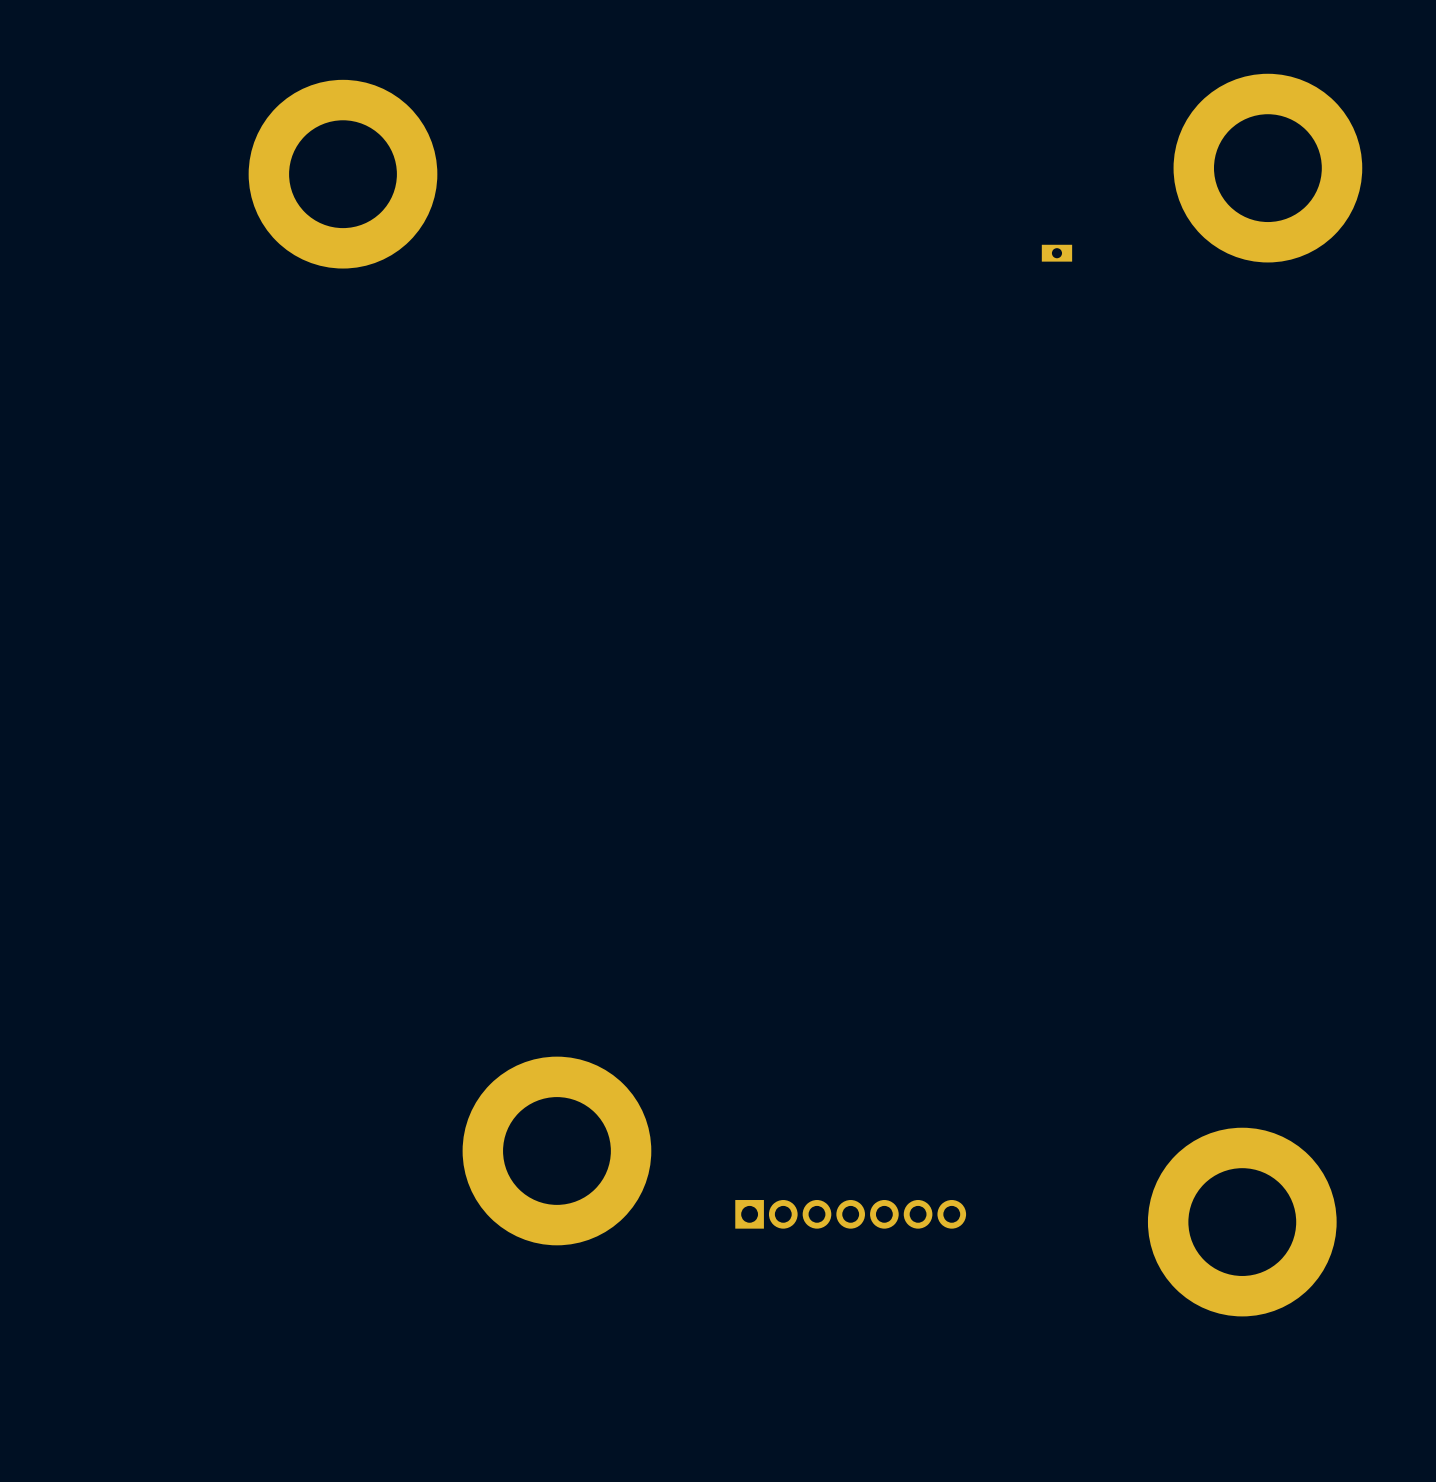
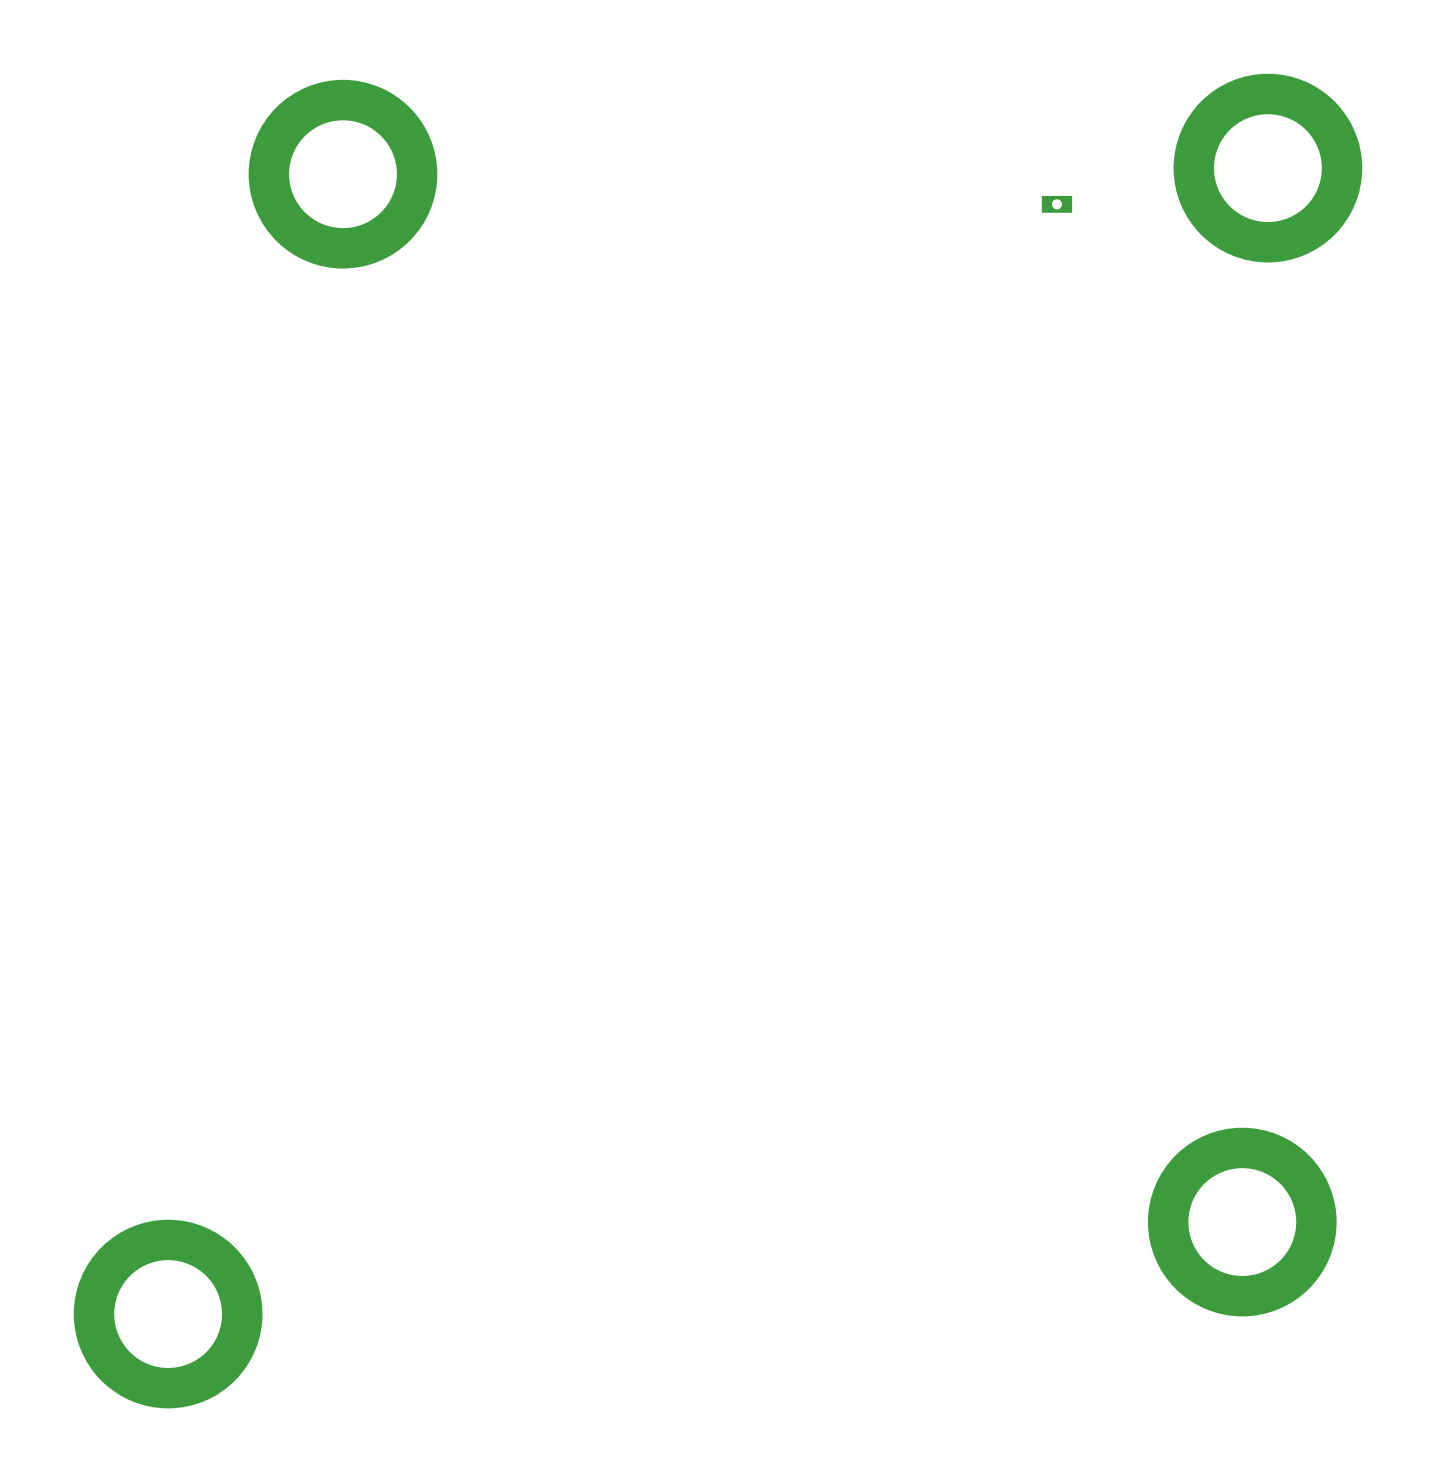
part position: (1056, 253) -> (1056, 204)
part position: (556, 1150) -> (168, 1314)
part: (850, 1214) -> none

